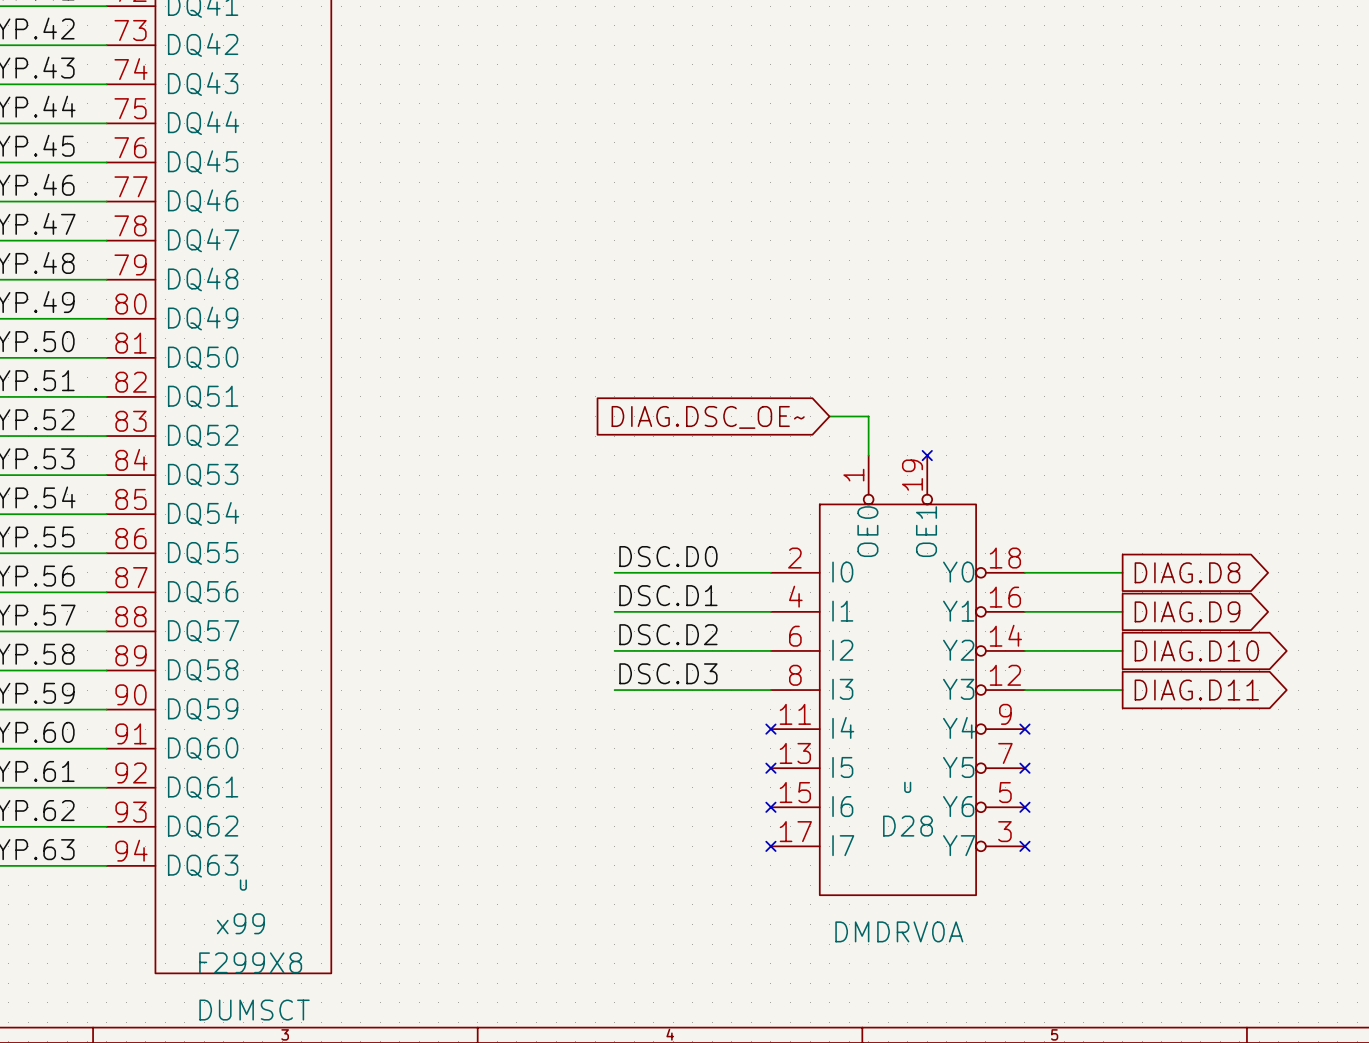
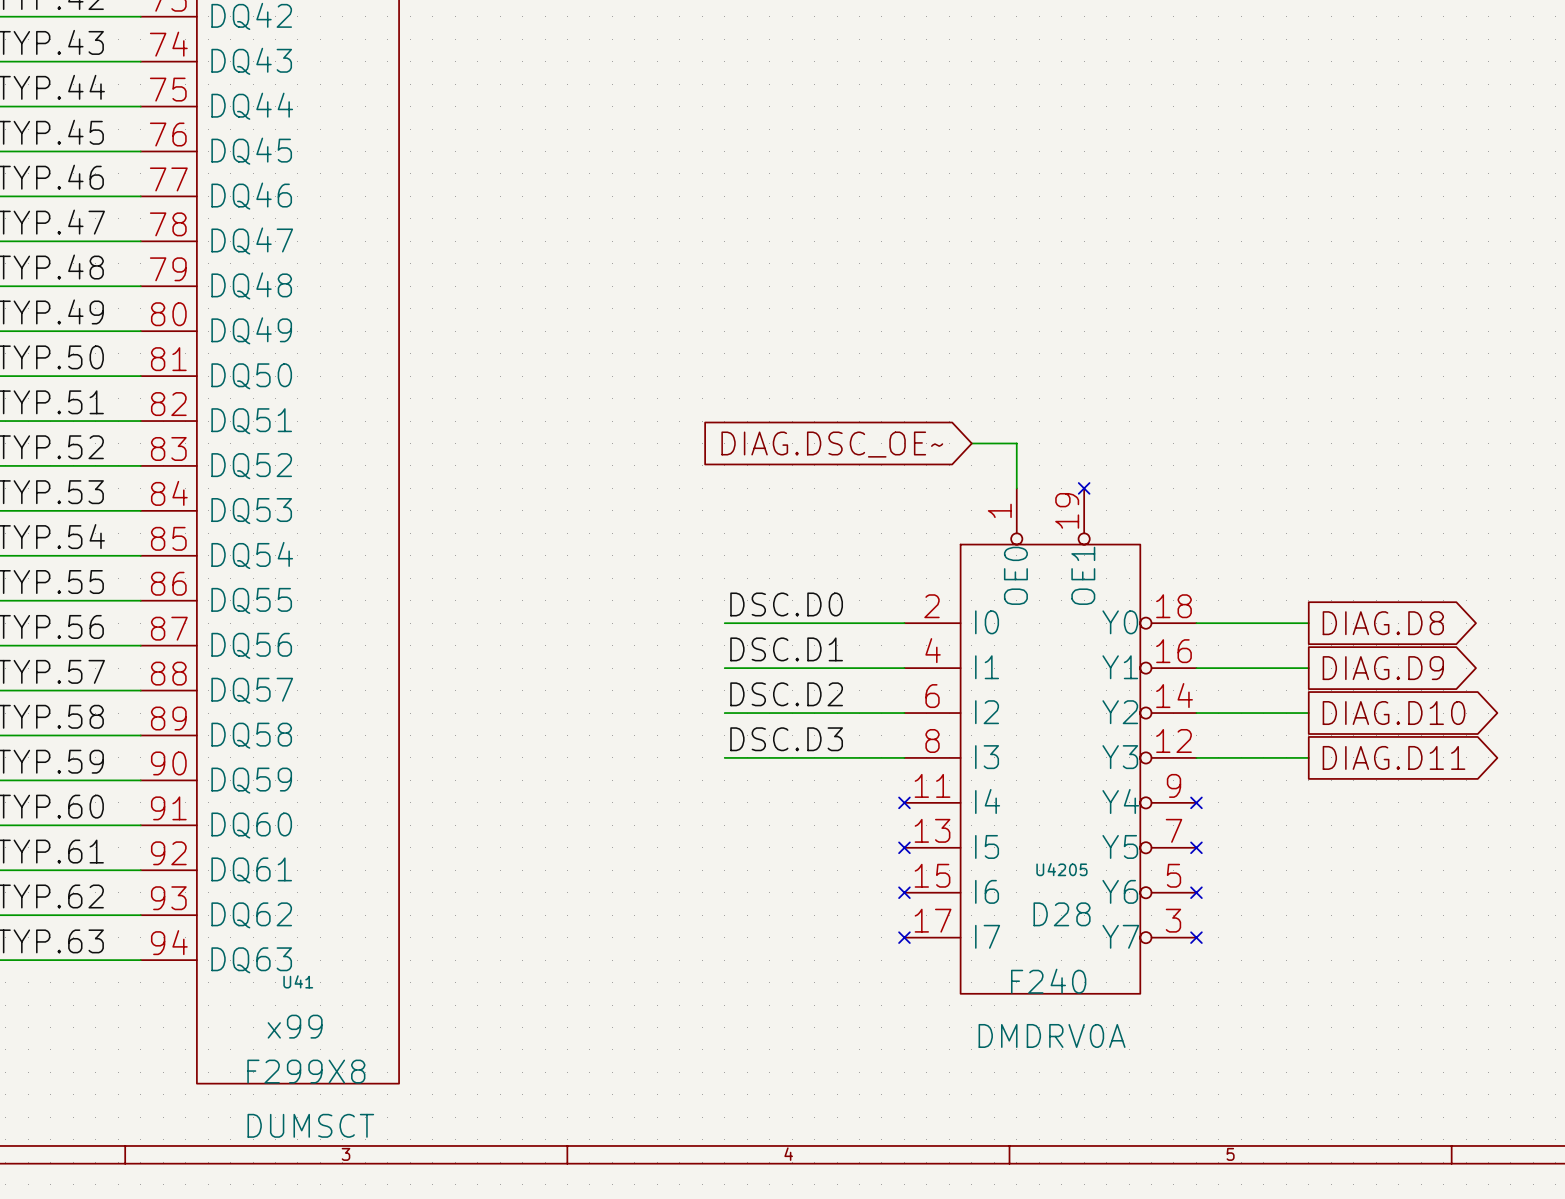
U name: U (907, 787) -> U4205 (1061, 869)
U value: none -> F240 (1048, 981)
U name: U (243, 885) -> U41 (298, 981)

